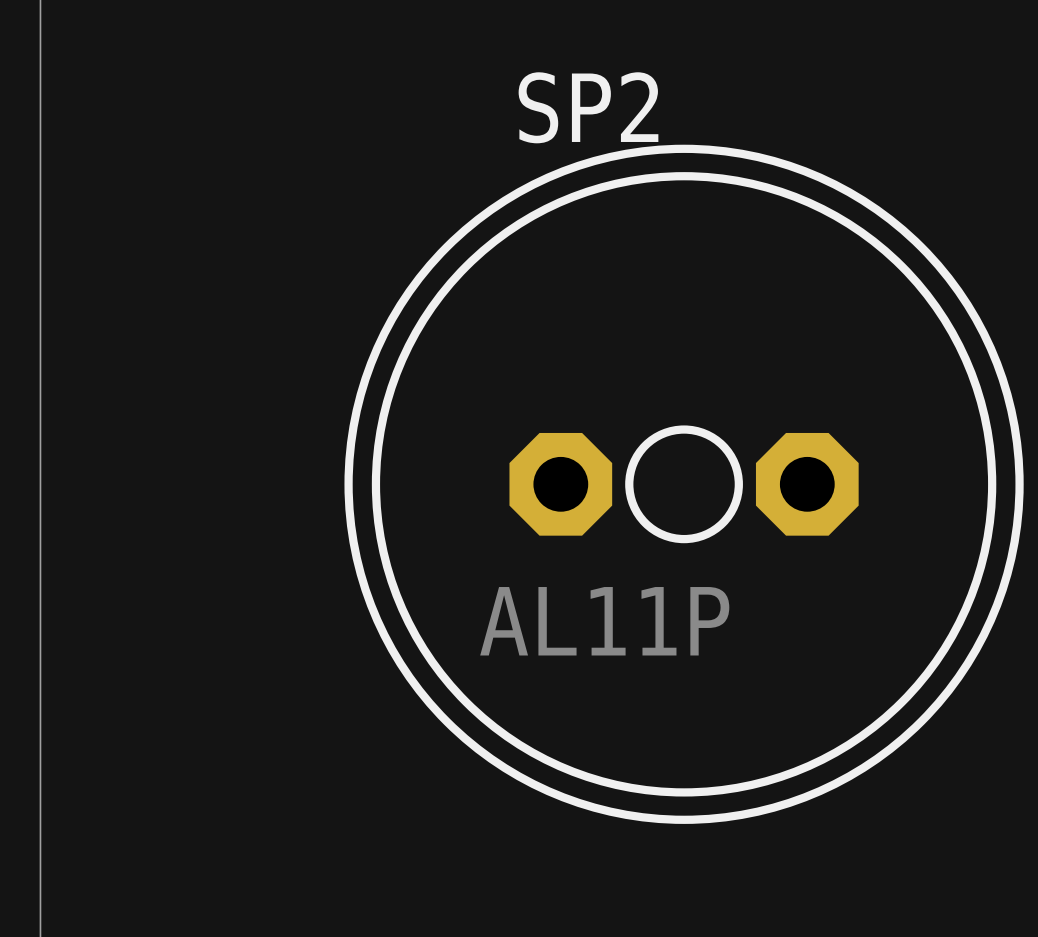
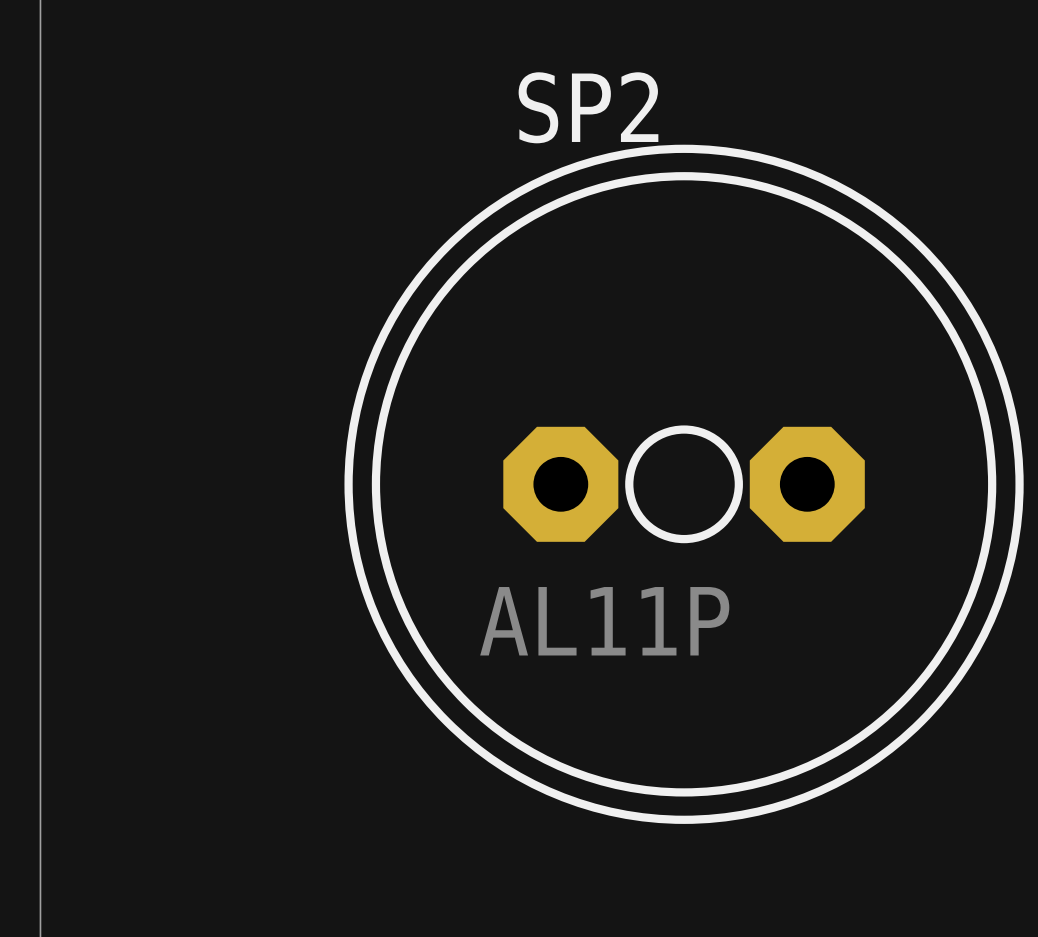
SP2 footprint: [344, 144, 1024, 824] -> [344, 144, 1024, 824]

